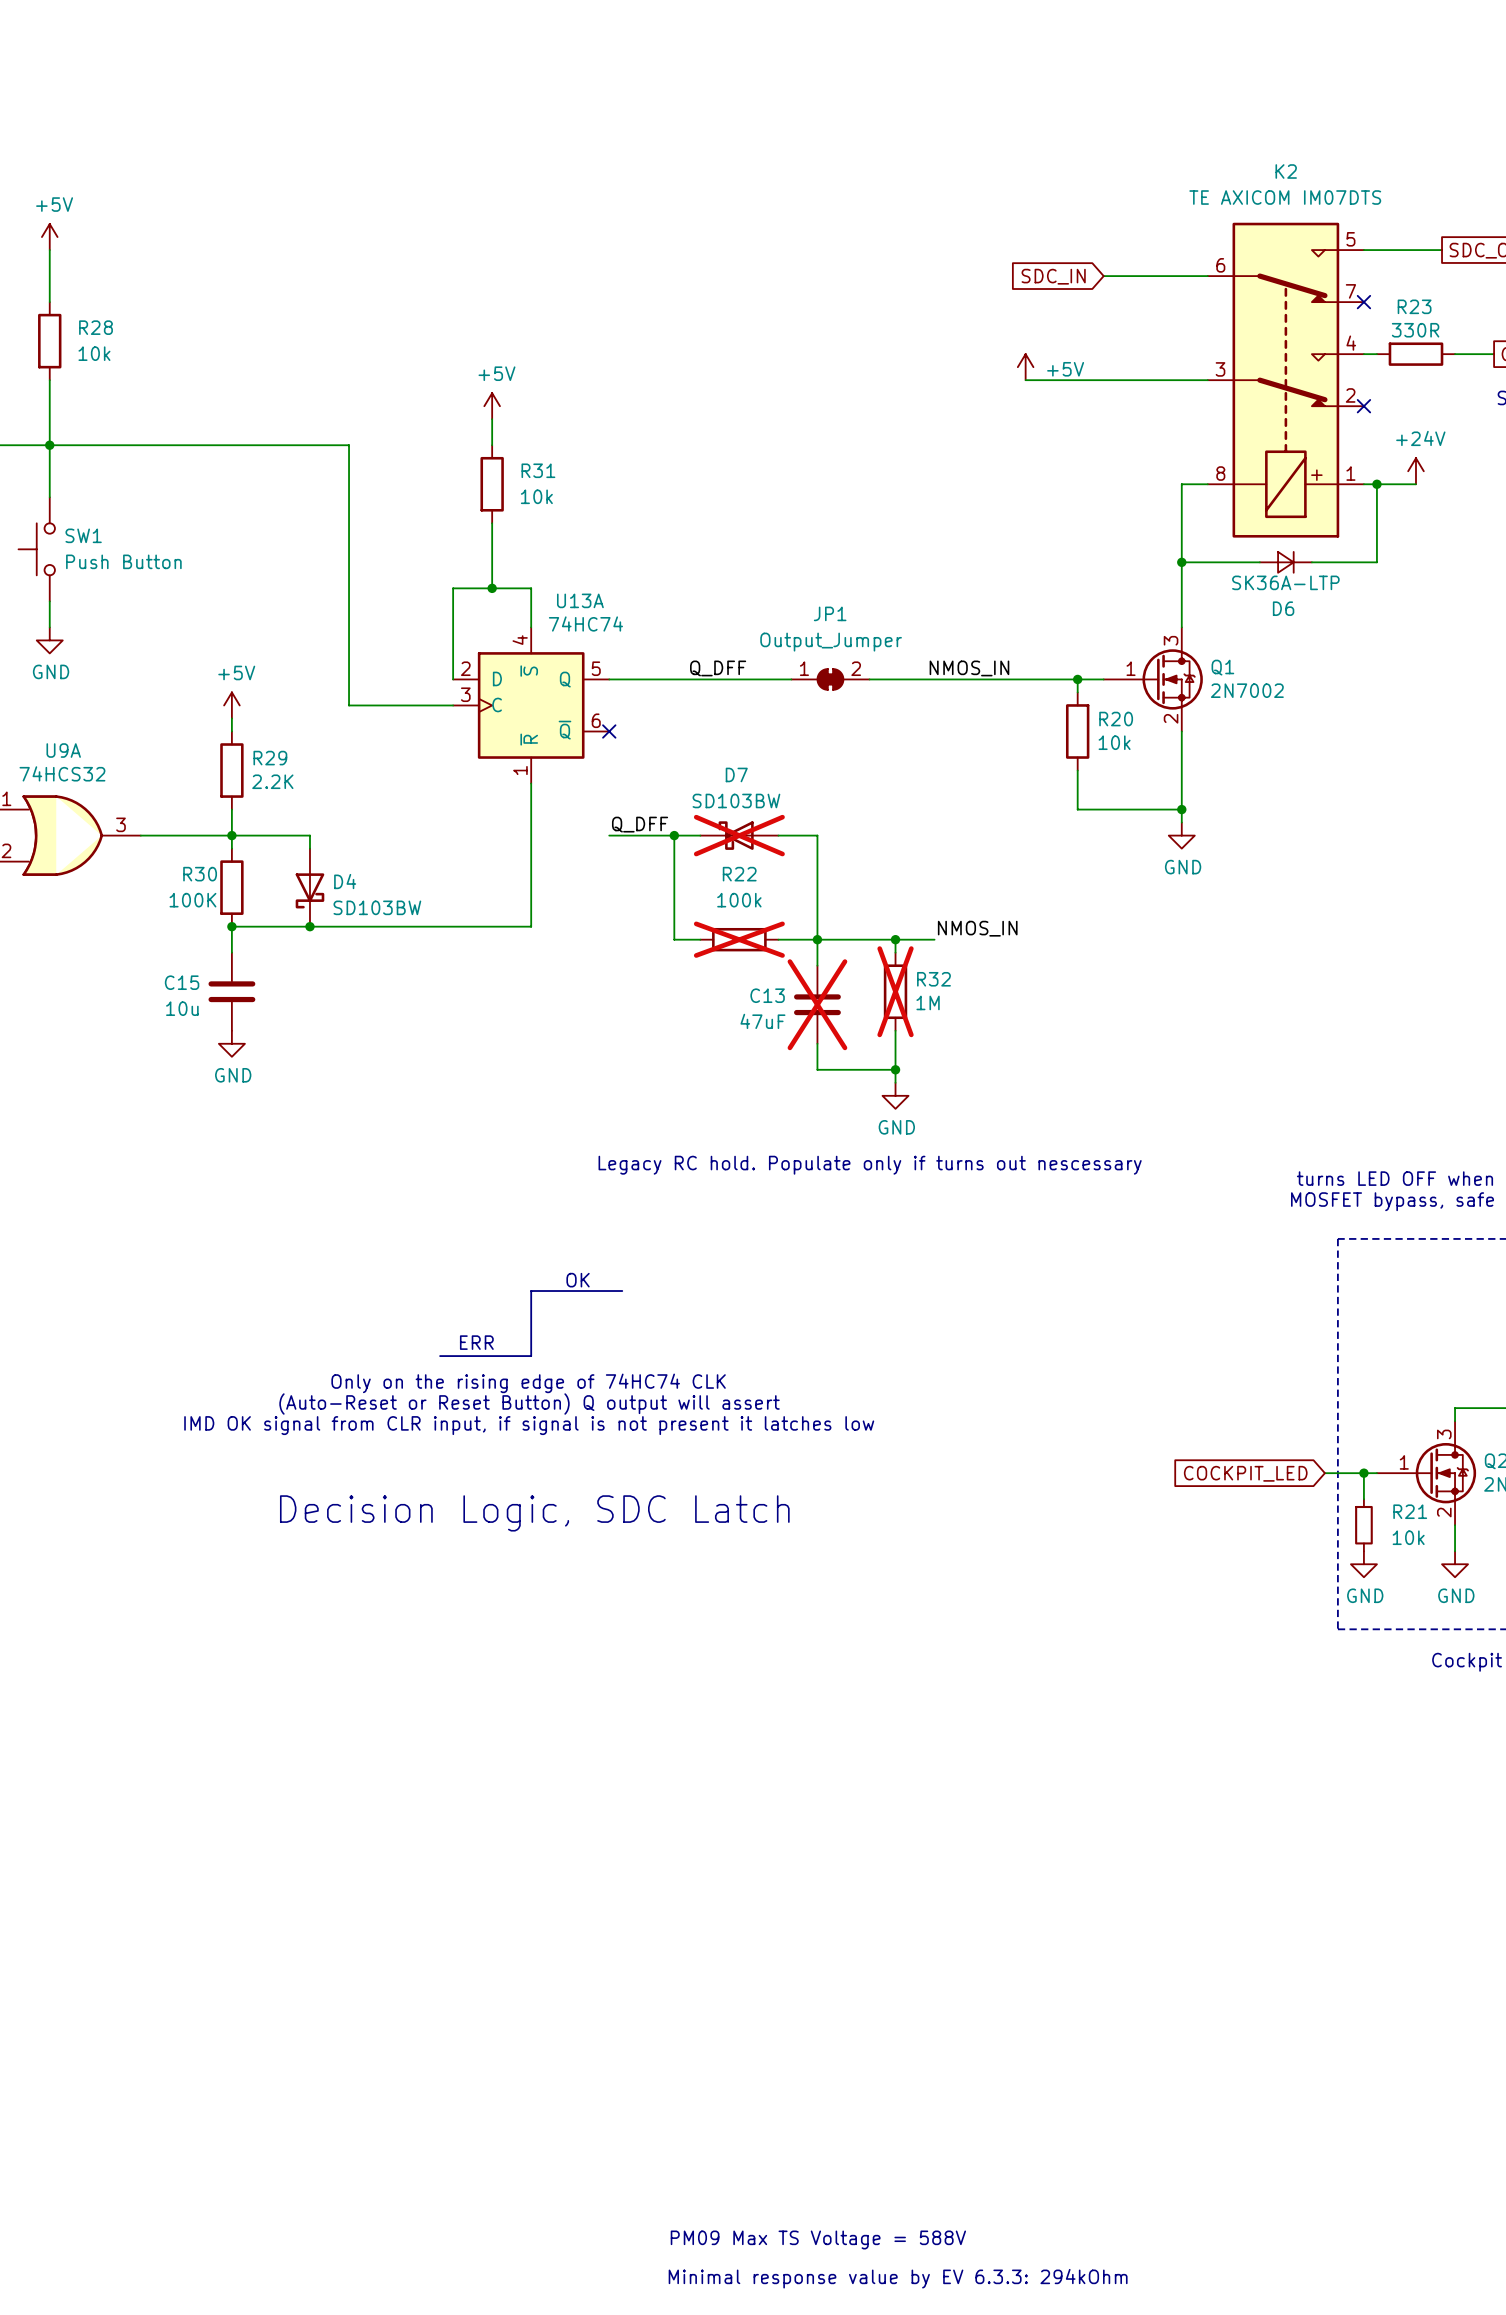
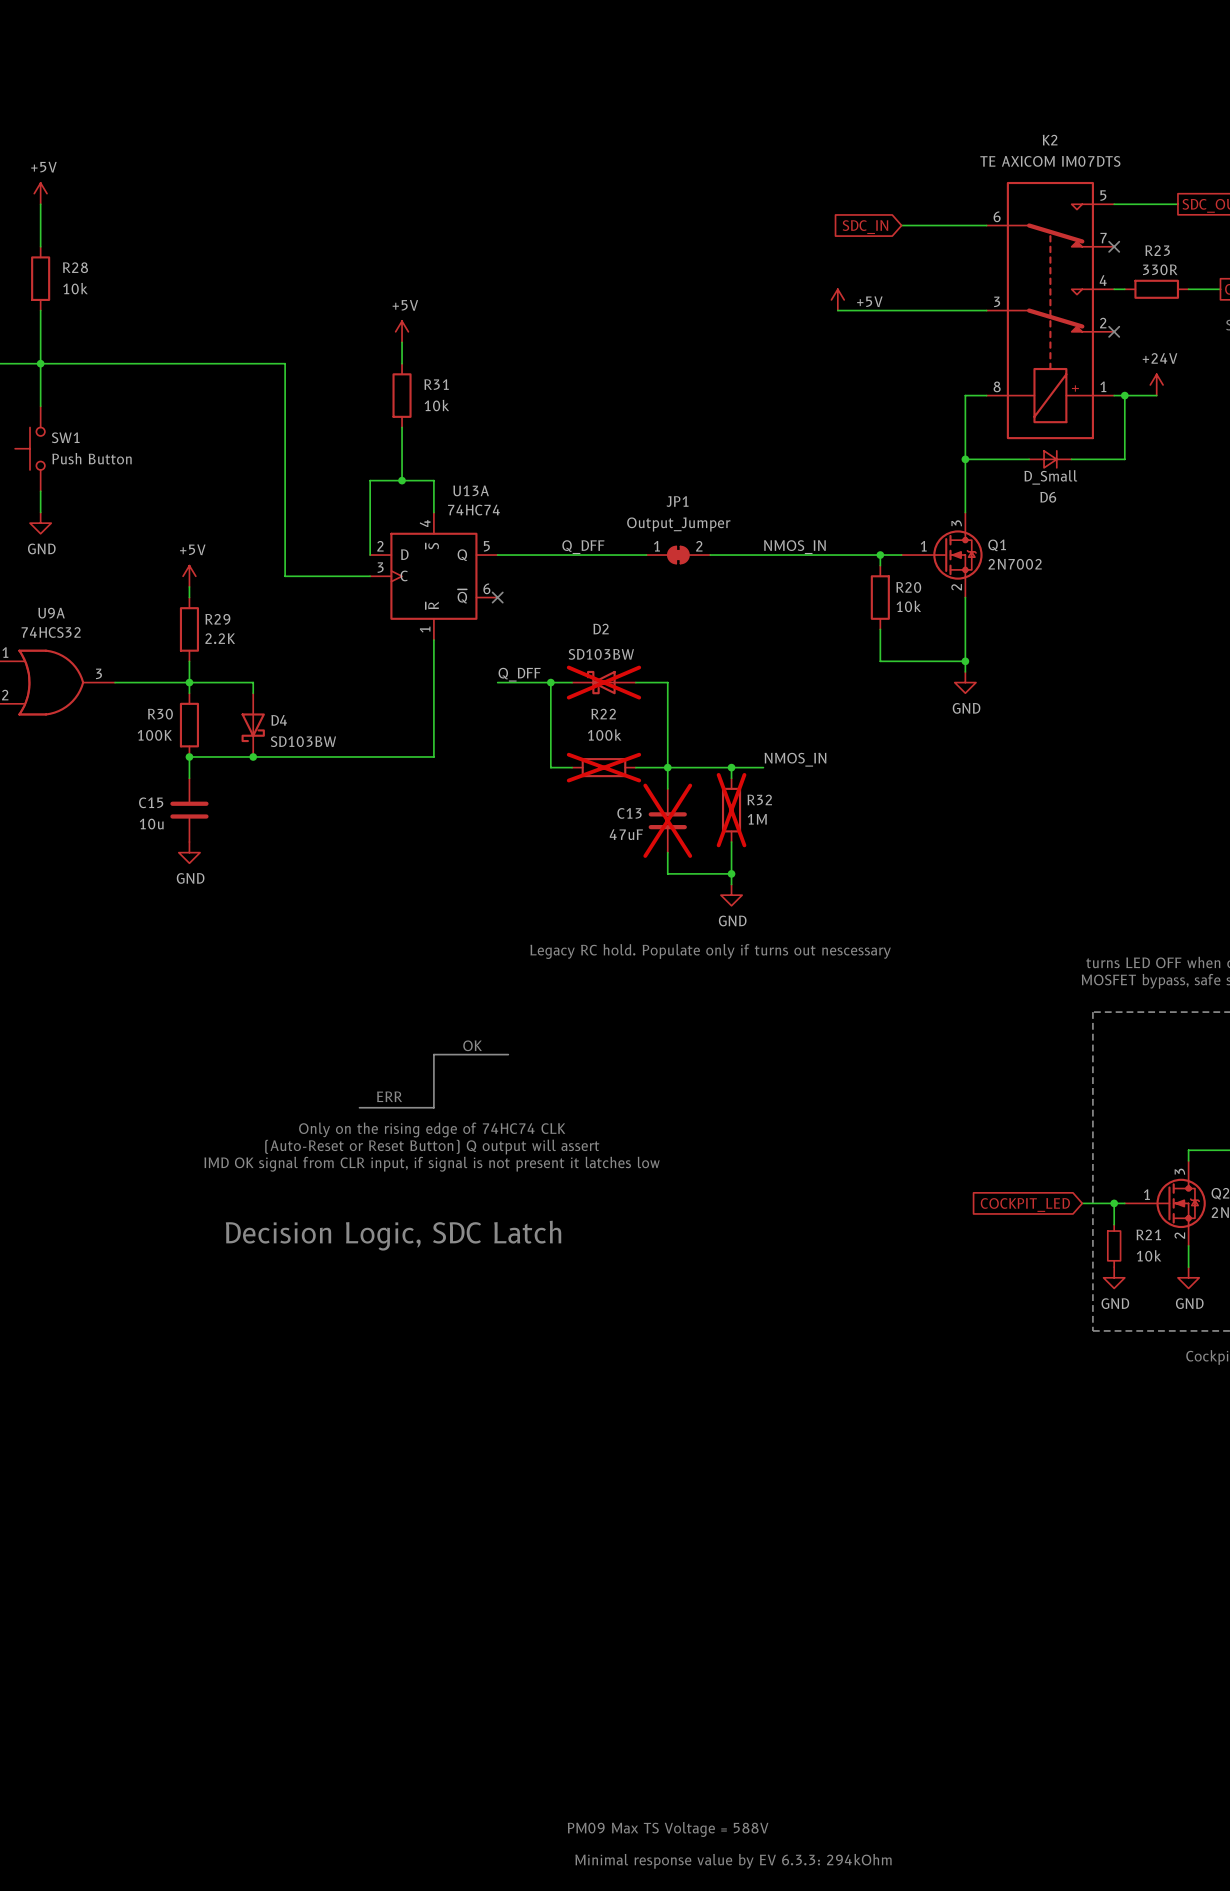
D6 value: SK36A-LTP (1285, 582) -> D_Small (1050, 477)
D7 name: D7 (736, 774) -> D2 (601, 629)

